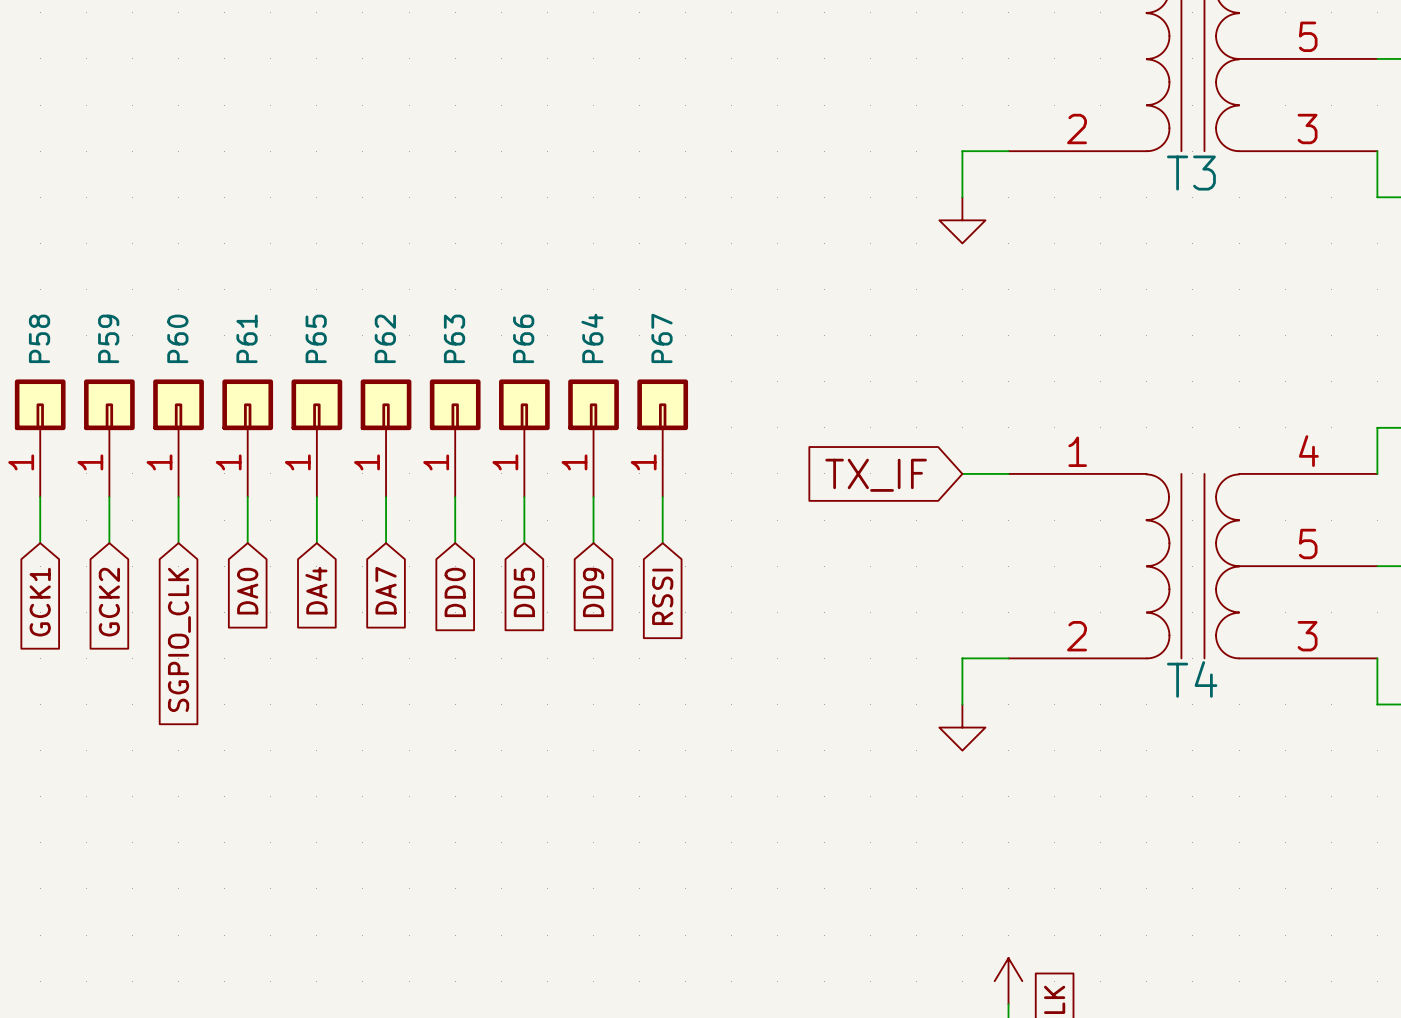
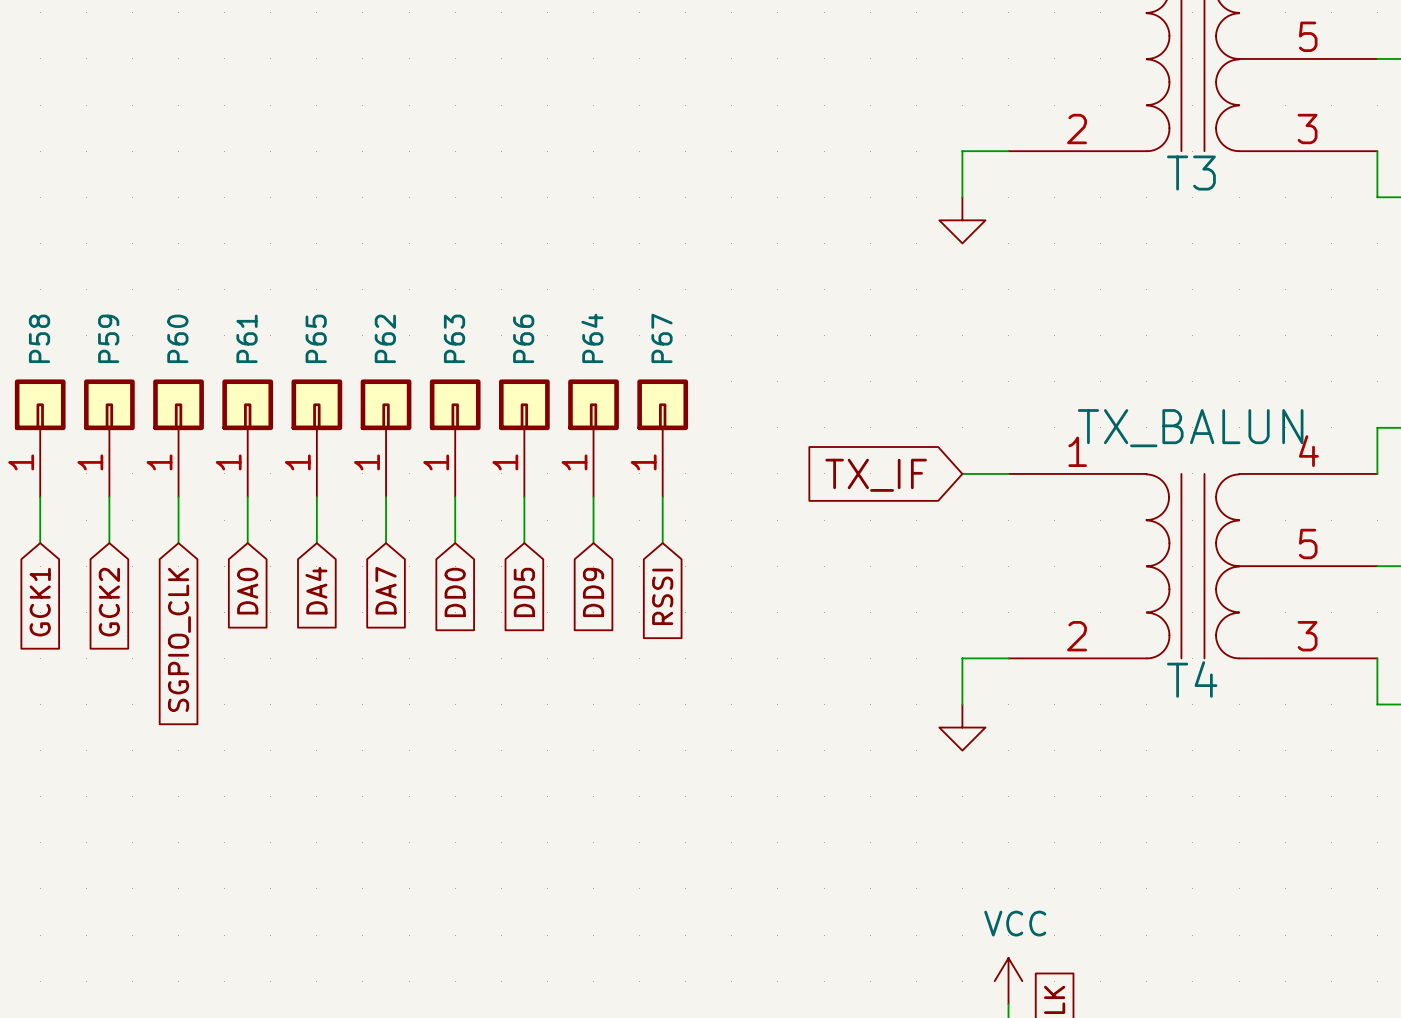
T4 value: none -> TX_BALUN (1190, 428)
power symbol text: none -> VCC (1015, 923)

